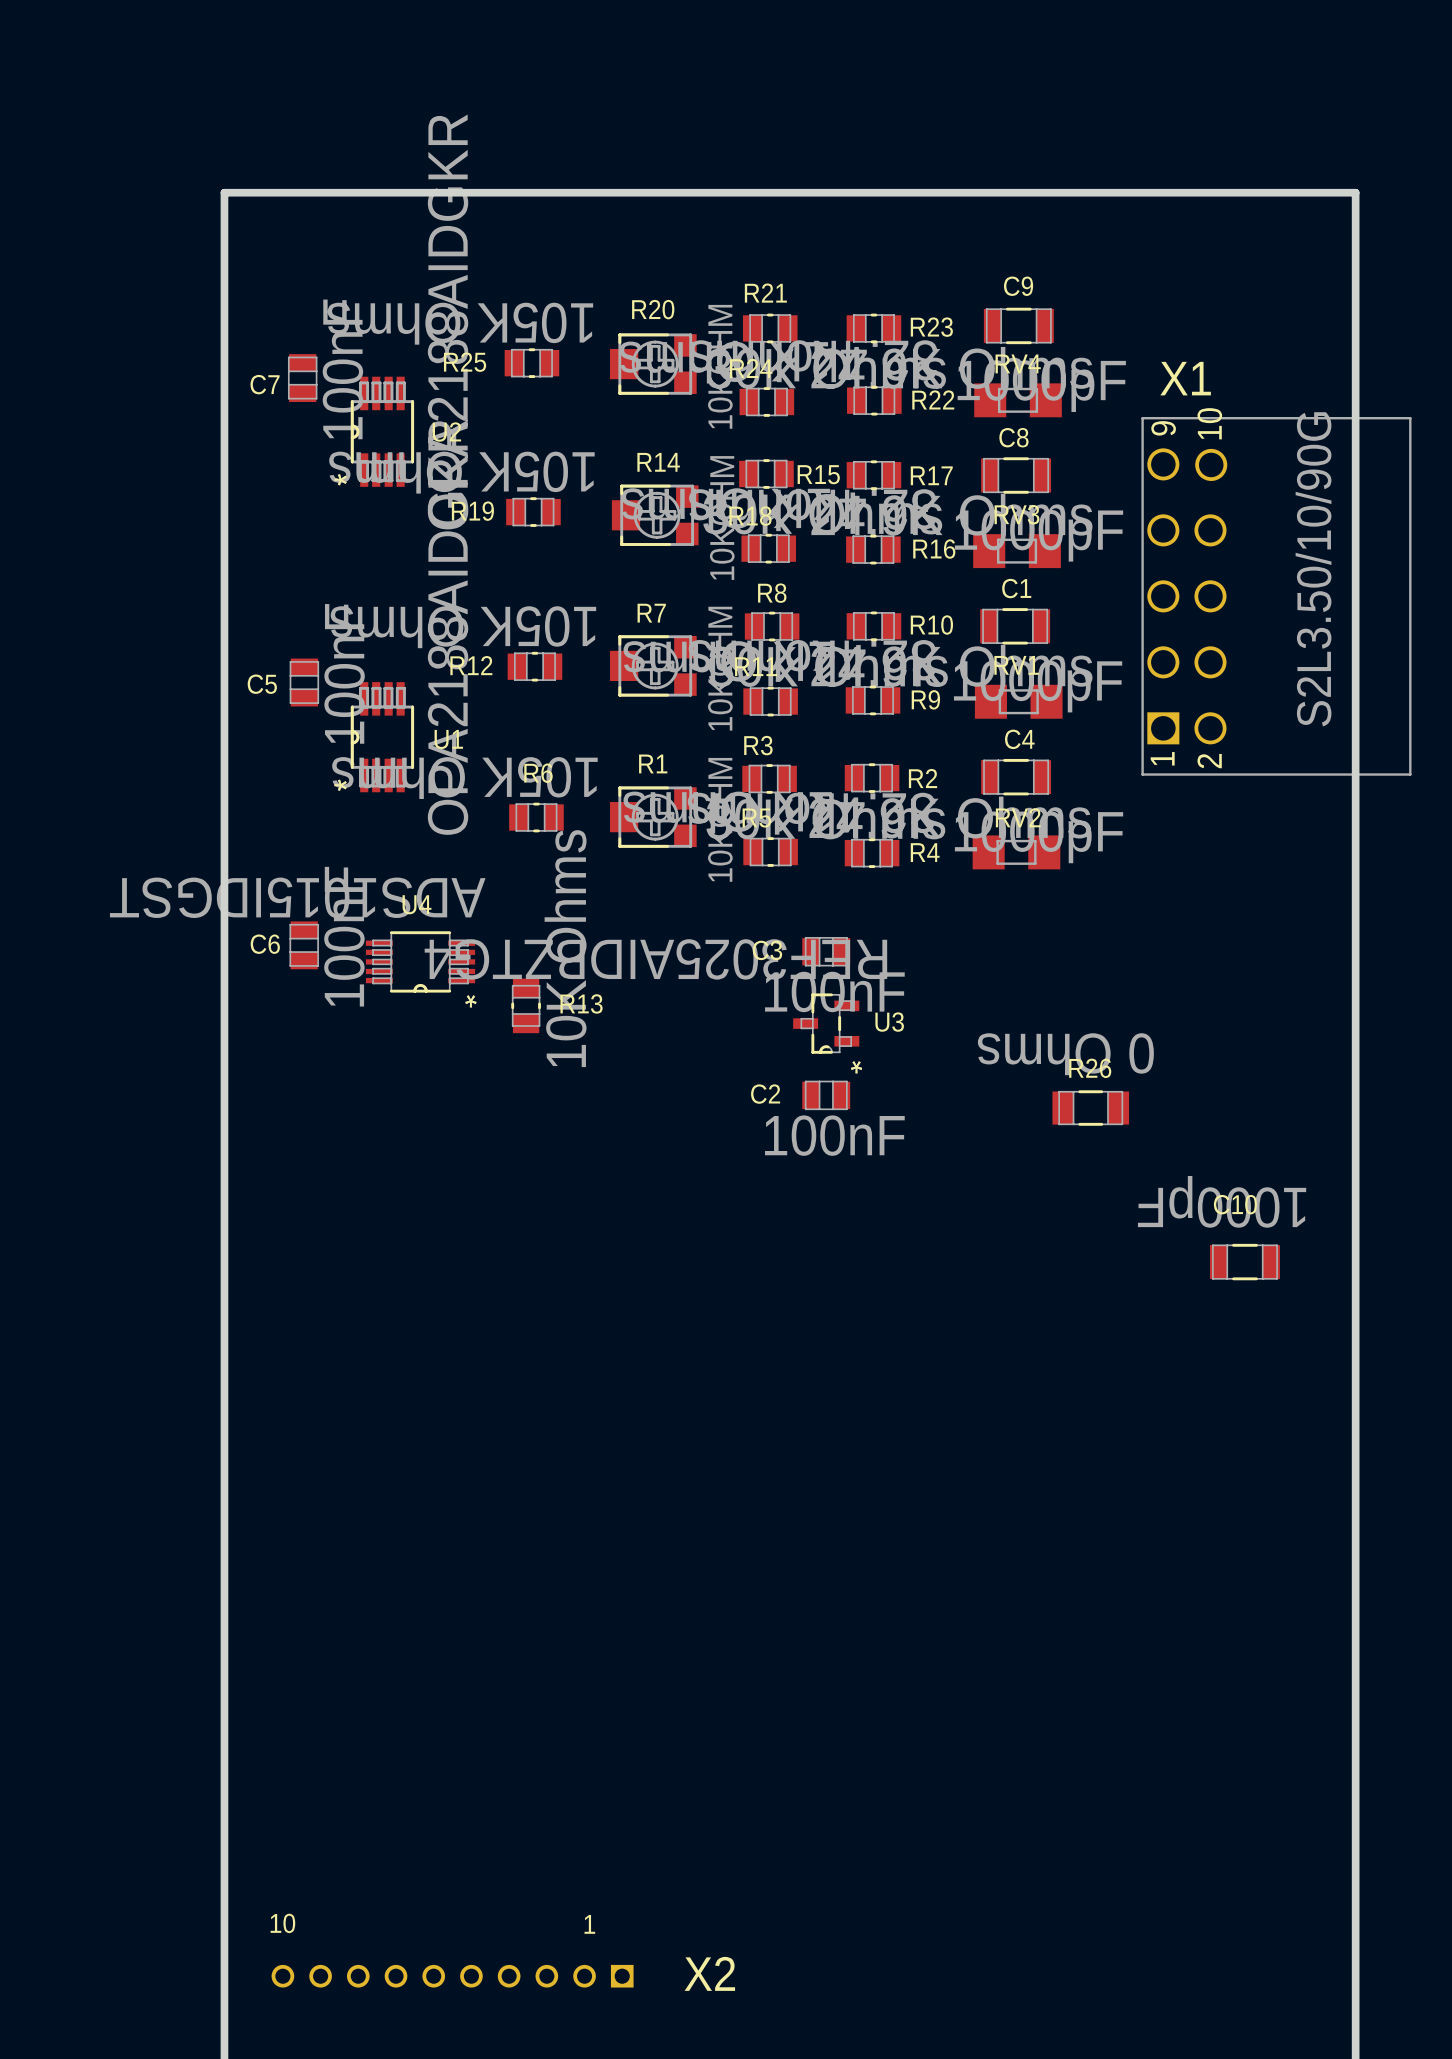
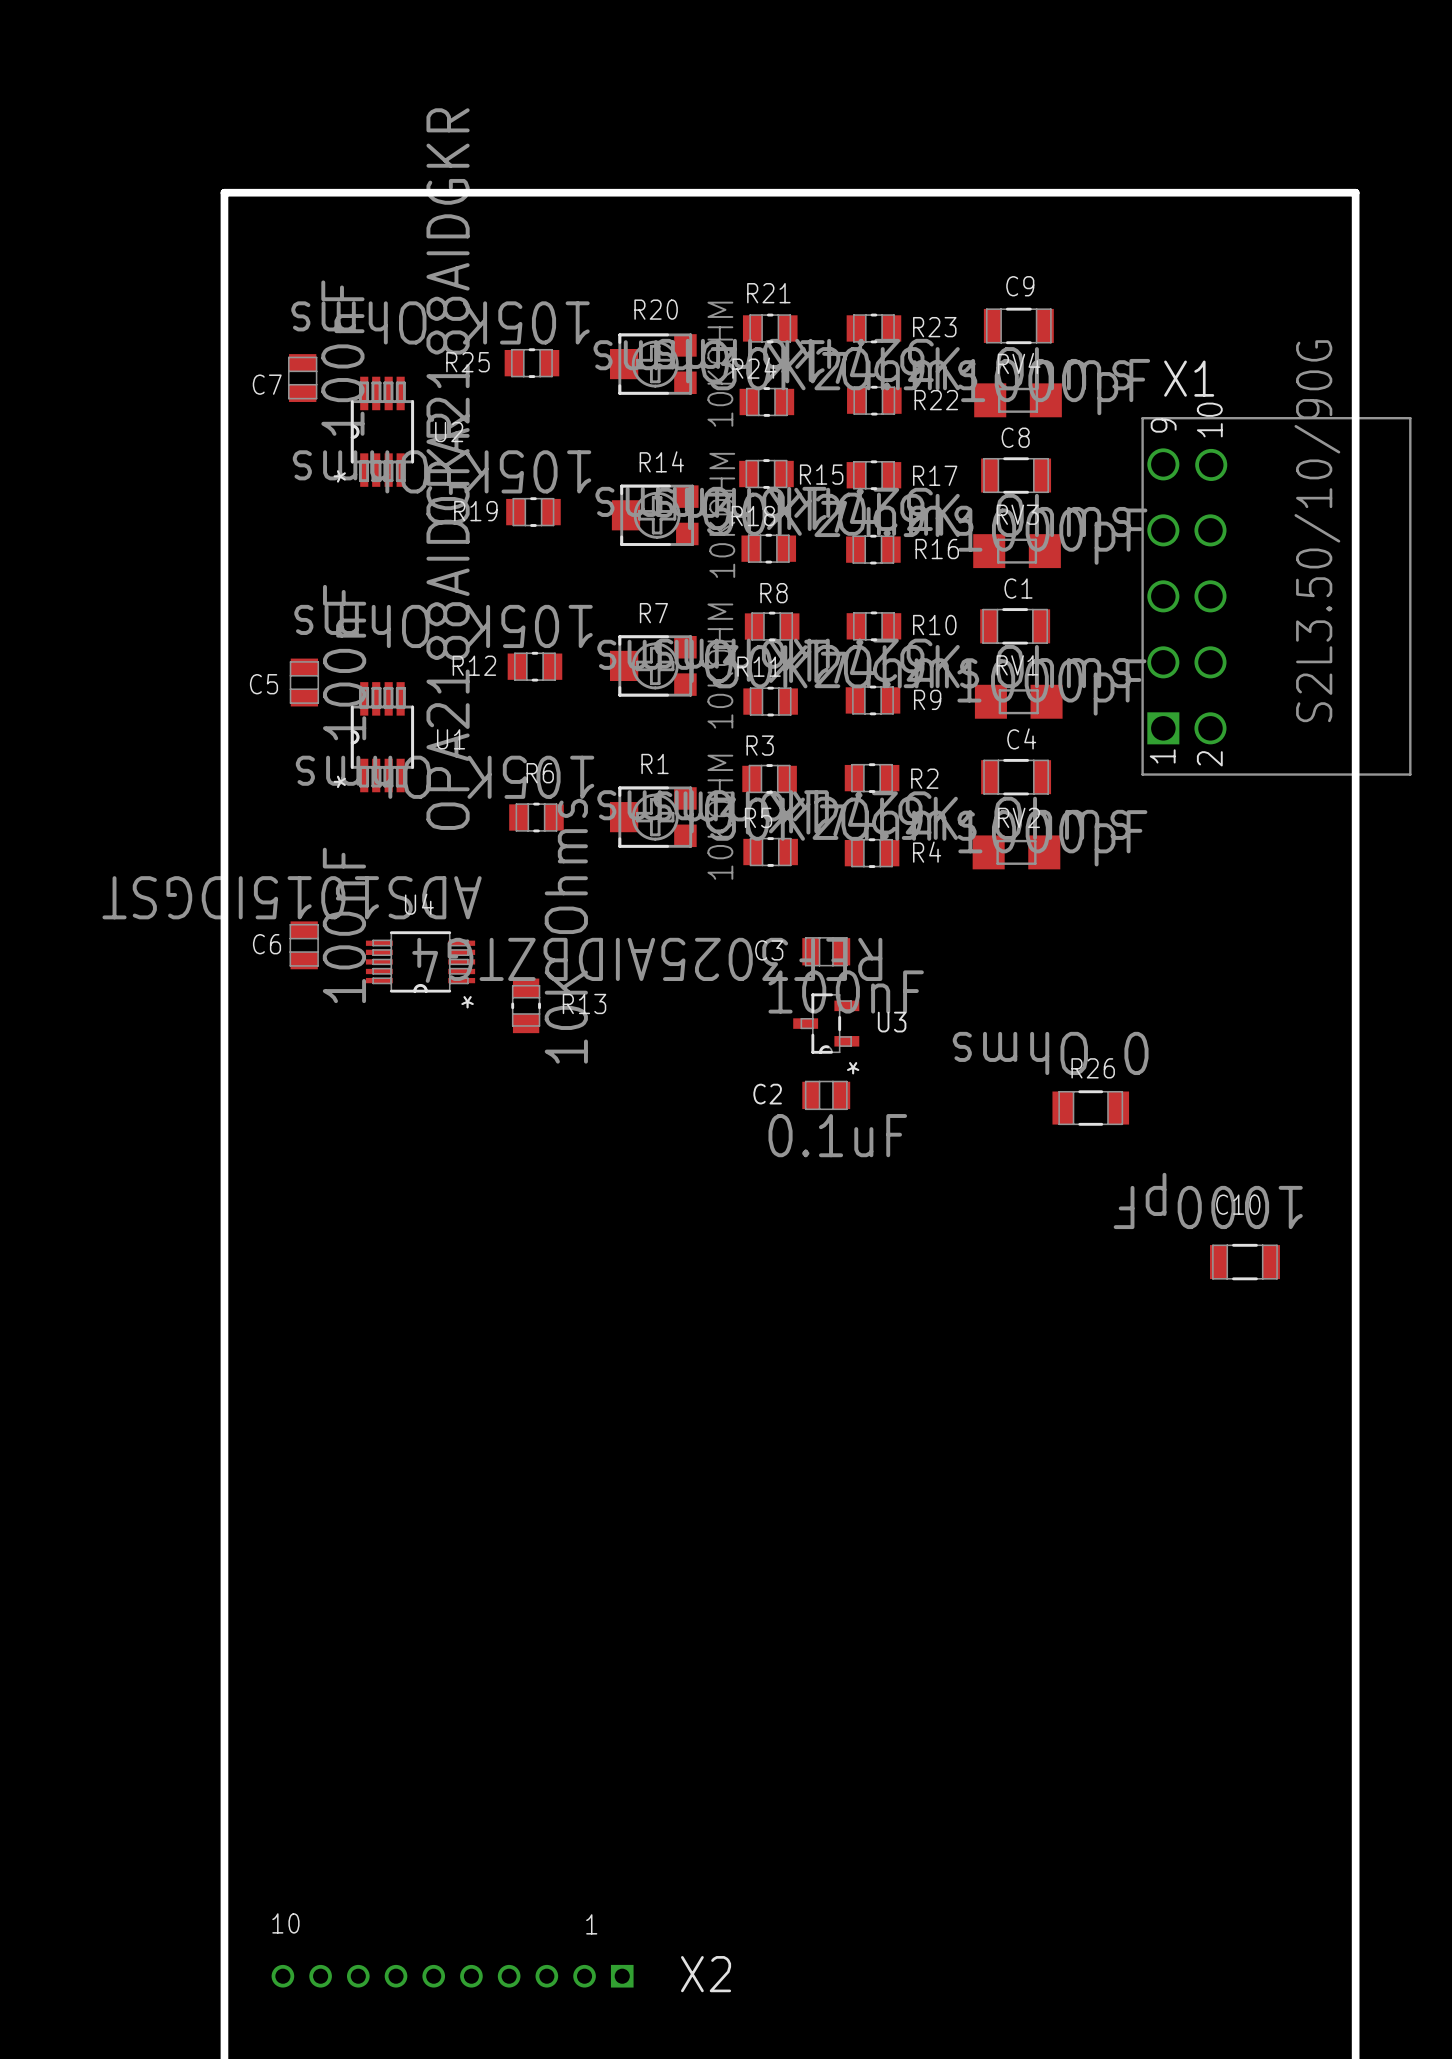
C2 value: 100nF (834, 1135) -> 0.1uF (837, 1135)

